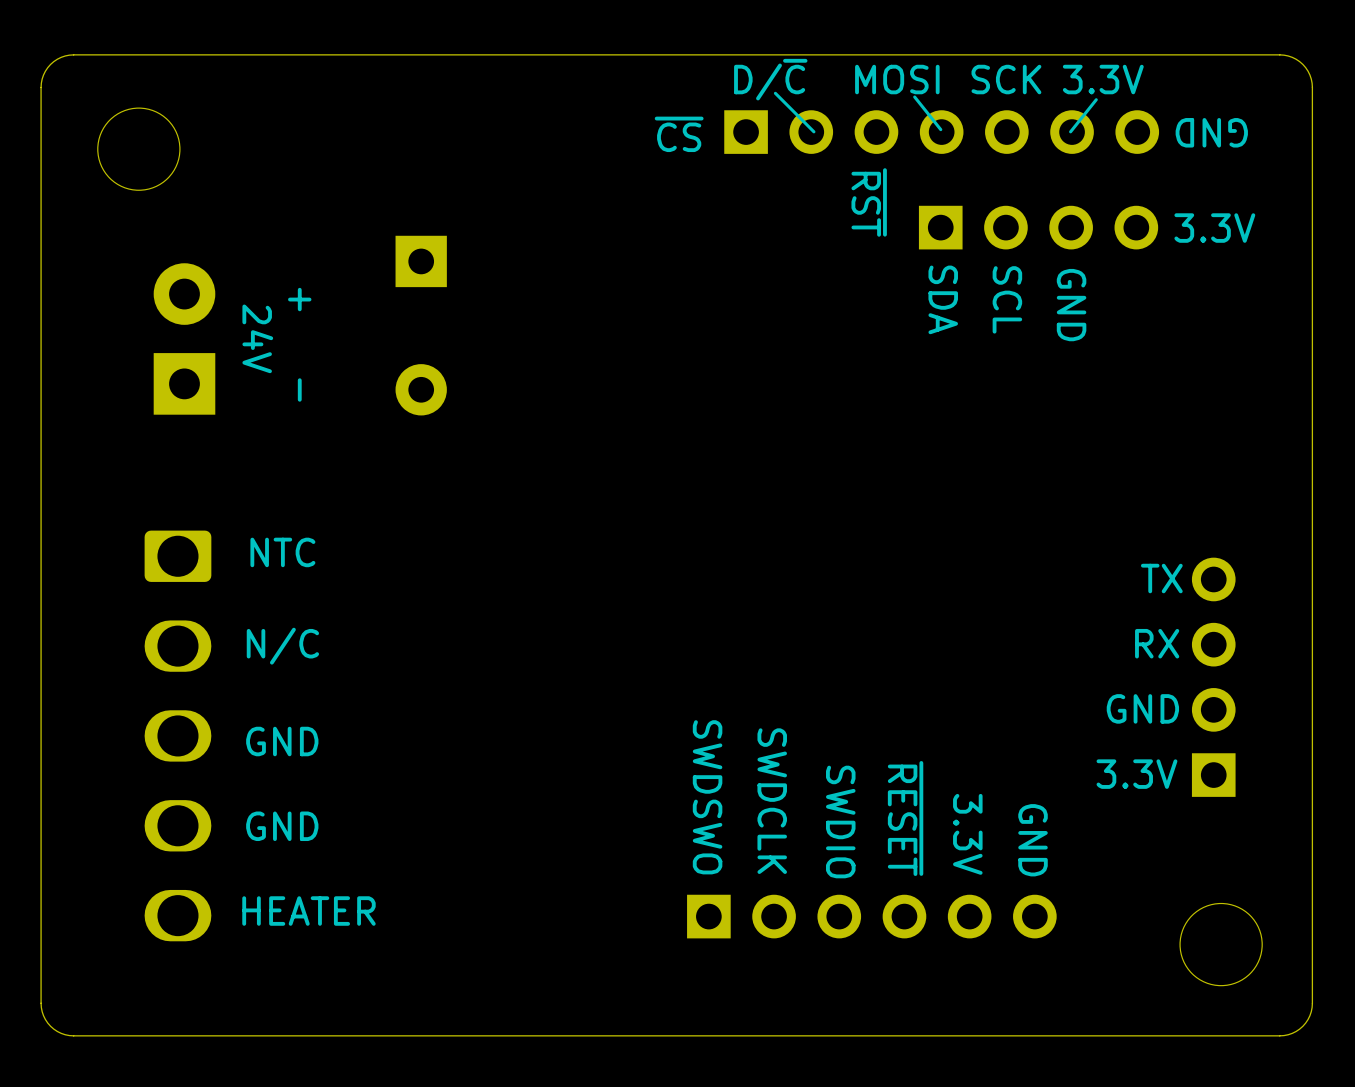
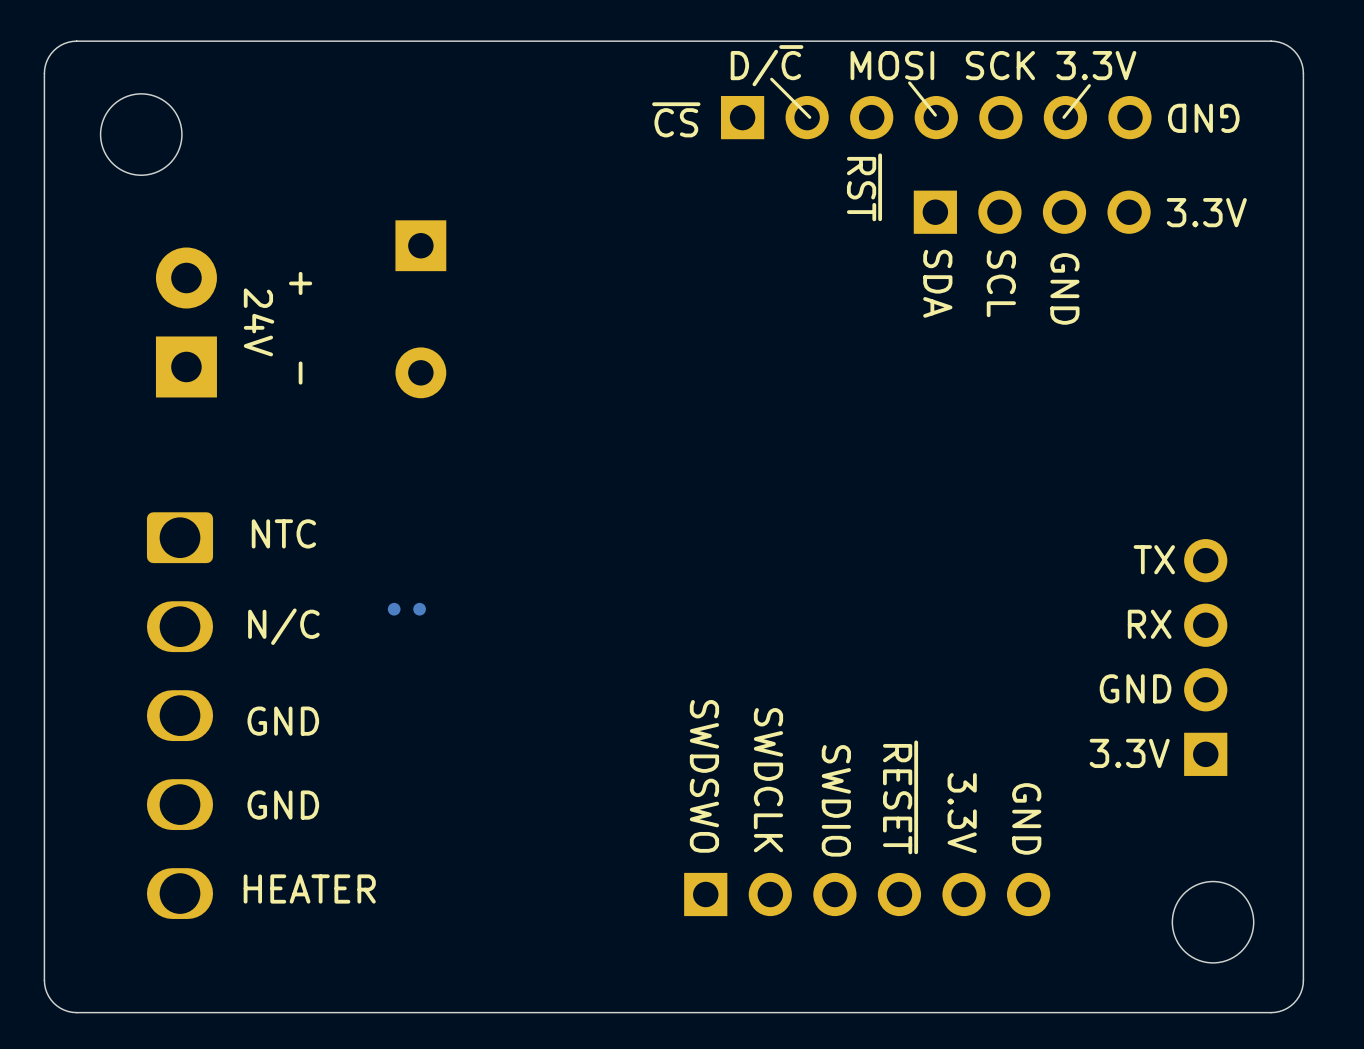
part: none -> (406, 609)

